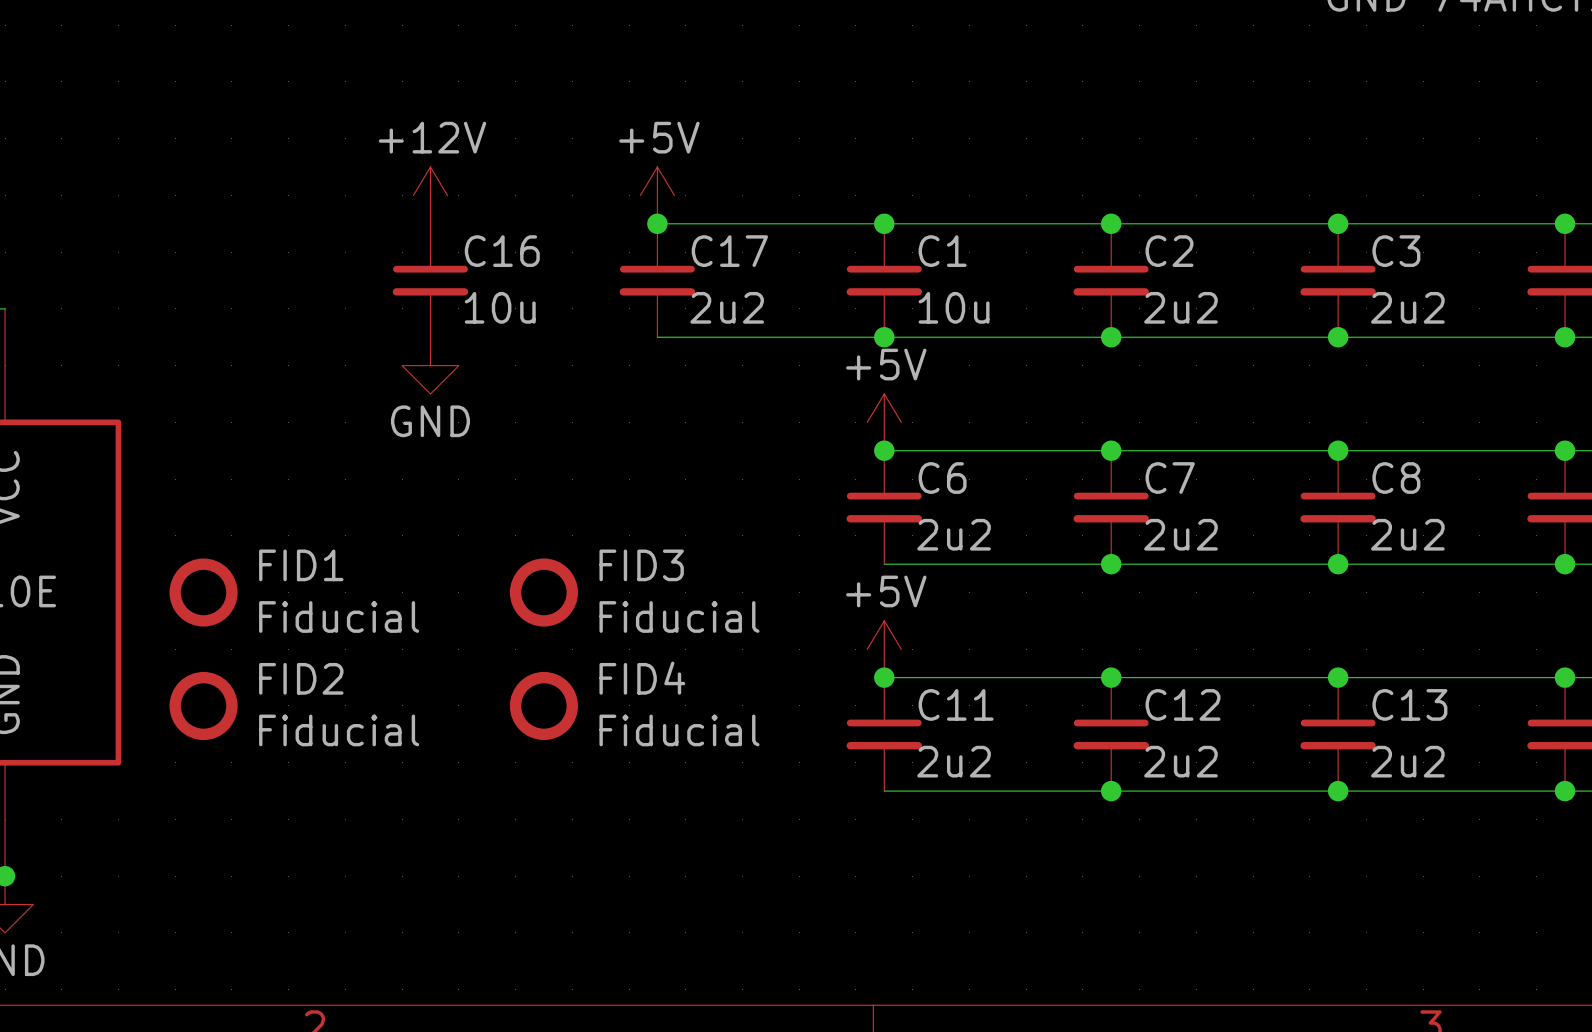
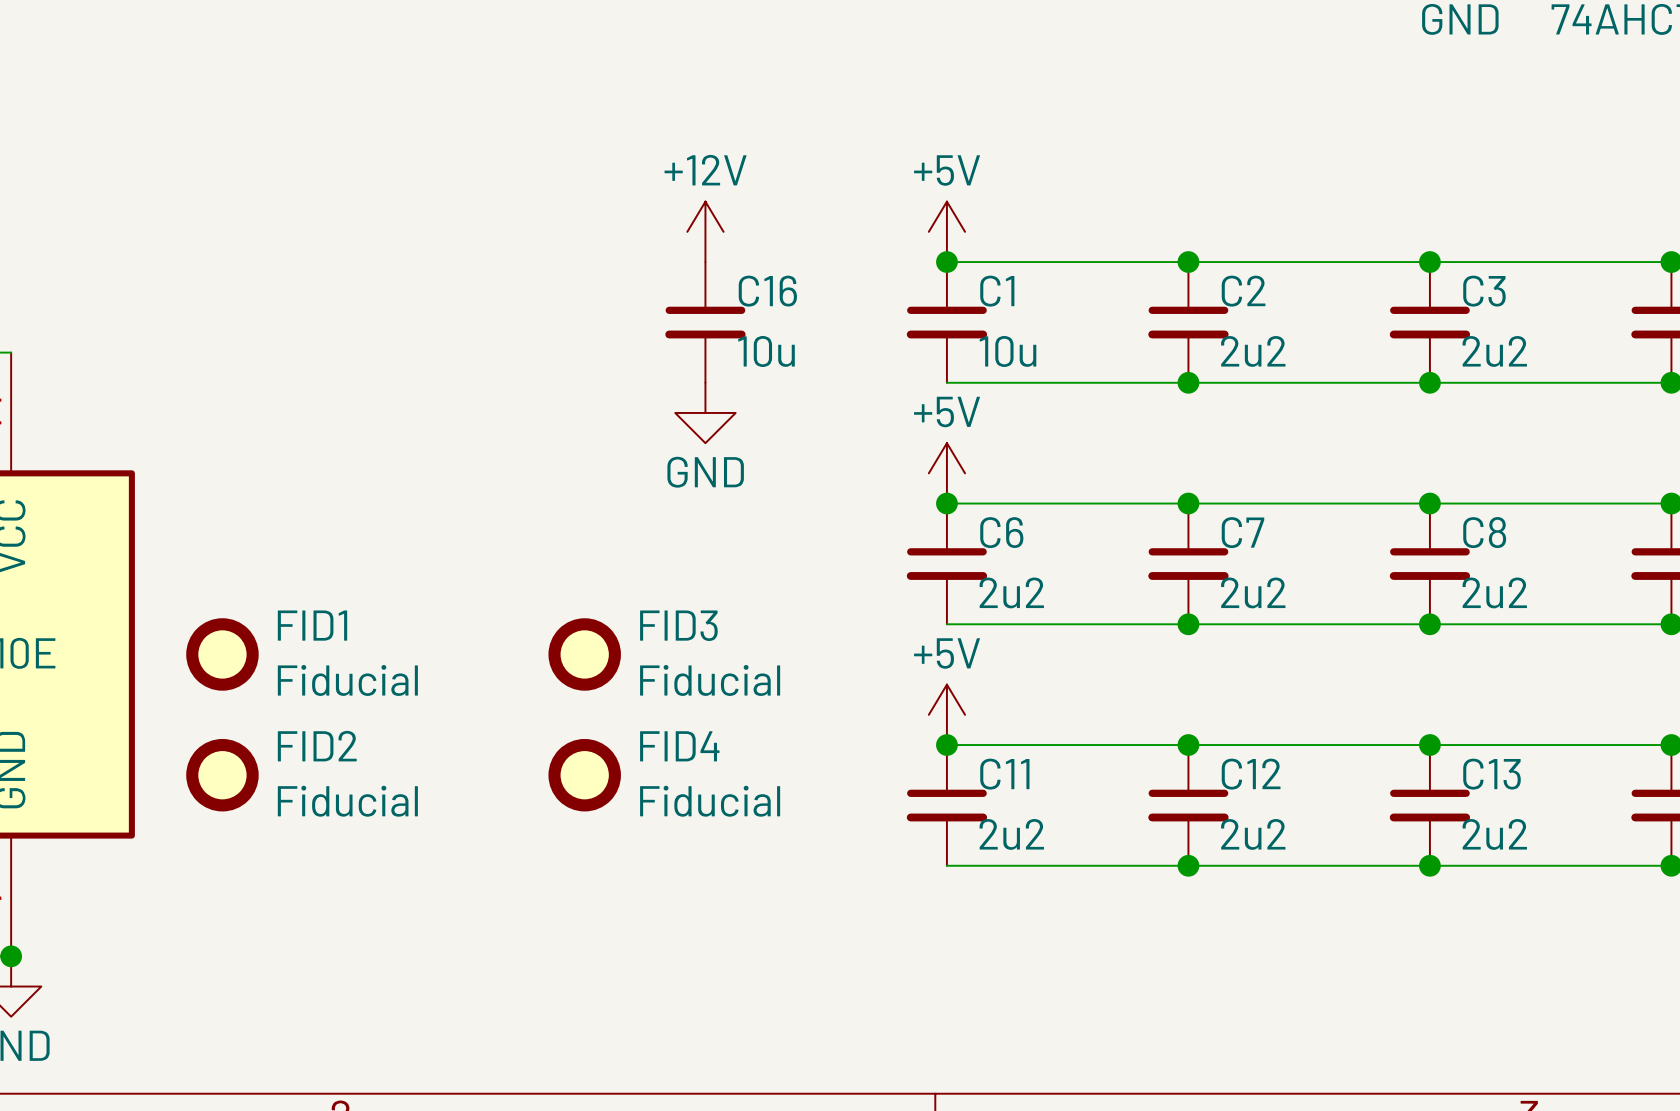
power symbol: +12V (430, 195) -> none
power symbol: +5V (657, 195) -> +12V (705, 231)
power symbol: none -> +5V (946, 231)
wire: (657, 223) (884, 223) -> none
junction: (657, 223) -> none
C17 name: C17 (729, 251) -> C16 (767, 291)
C16: 10u (430, 280) -> none
C17 value: 2u2 (727, 307) -> 10u (766, 351)
wire: (657, 337) (884, 337) -> none
junction: (884, 337) -> none
power symbol position: GND (430, 365) -> GND (705, 412)

